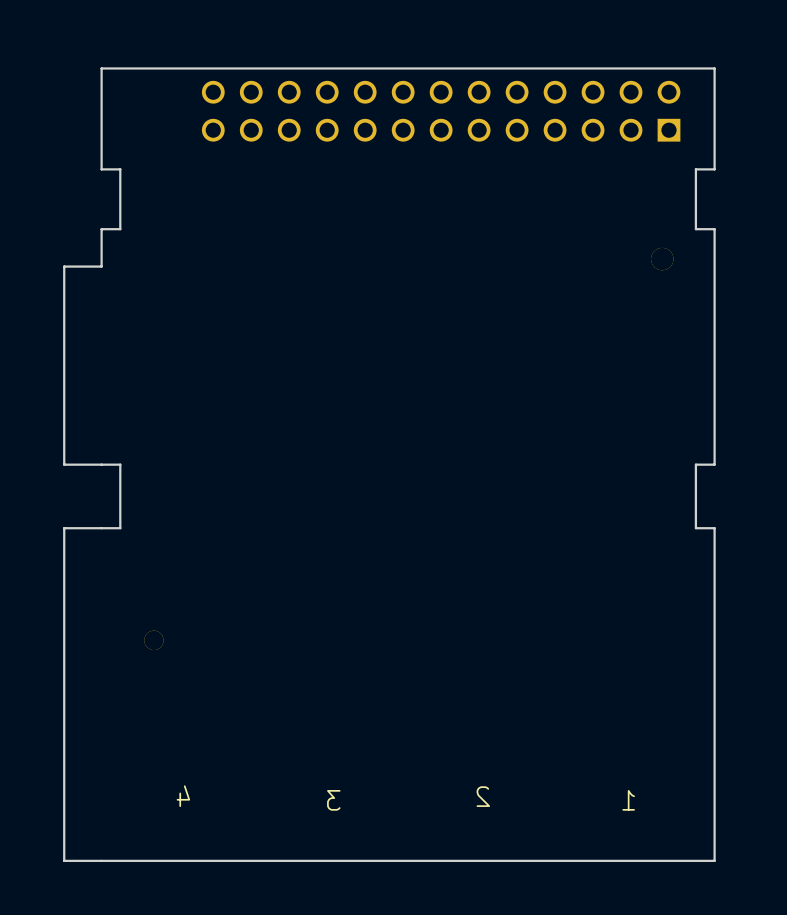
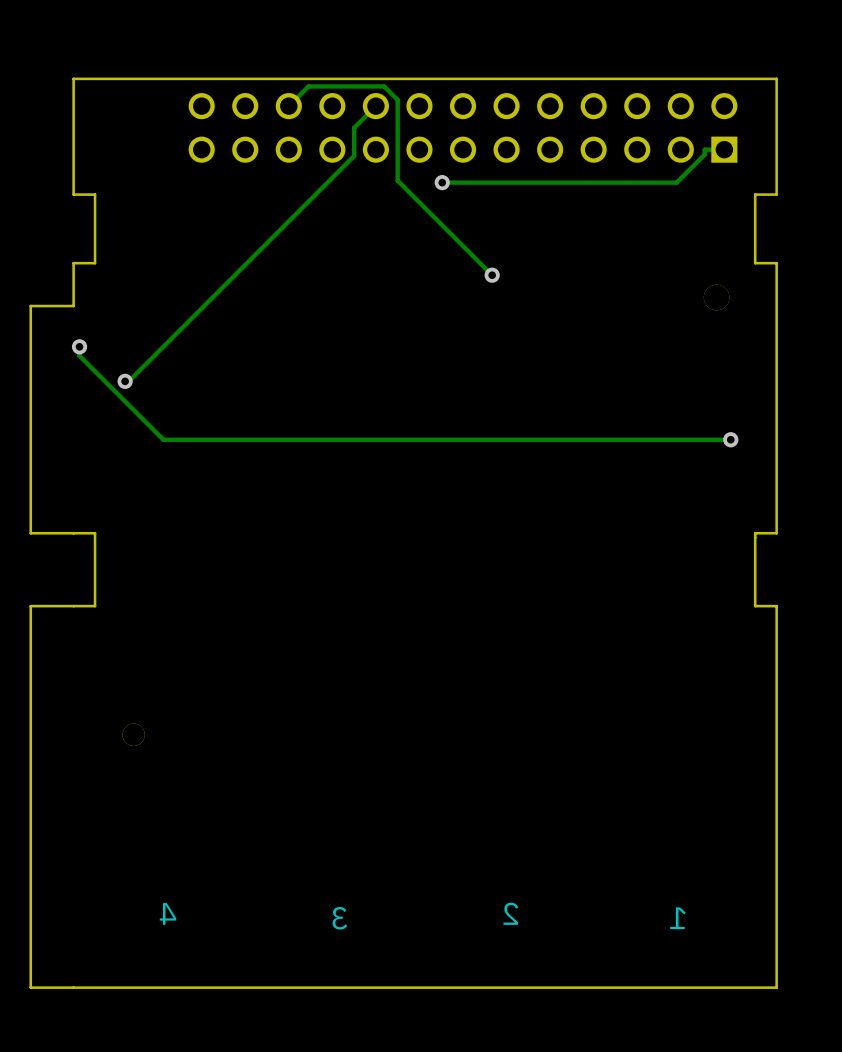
track: none -> (288, 106) (308, 86) (384, 86) (397, 99) (397, 180) (492, 275)
track: none -> (375, 106) (354, 127) (354, 156) (128, 381) (125, 381)
track: none -> (724, 149) (704, 149) (704, 154) (676, 182) (442, 182)
via: none -> (442, 182)
via: none -> (492, 275)
track: none -> (79, 346) (79, 355) (163, 439) (730, 439)
via: none -> (79, 346)
via: none -> (125, 381)
via: none -> (730, 439)

